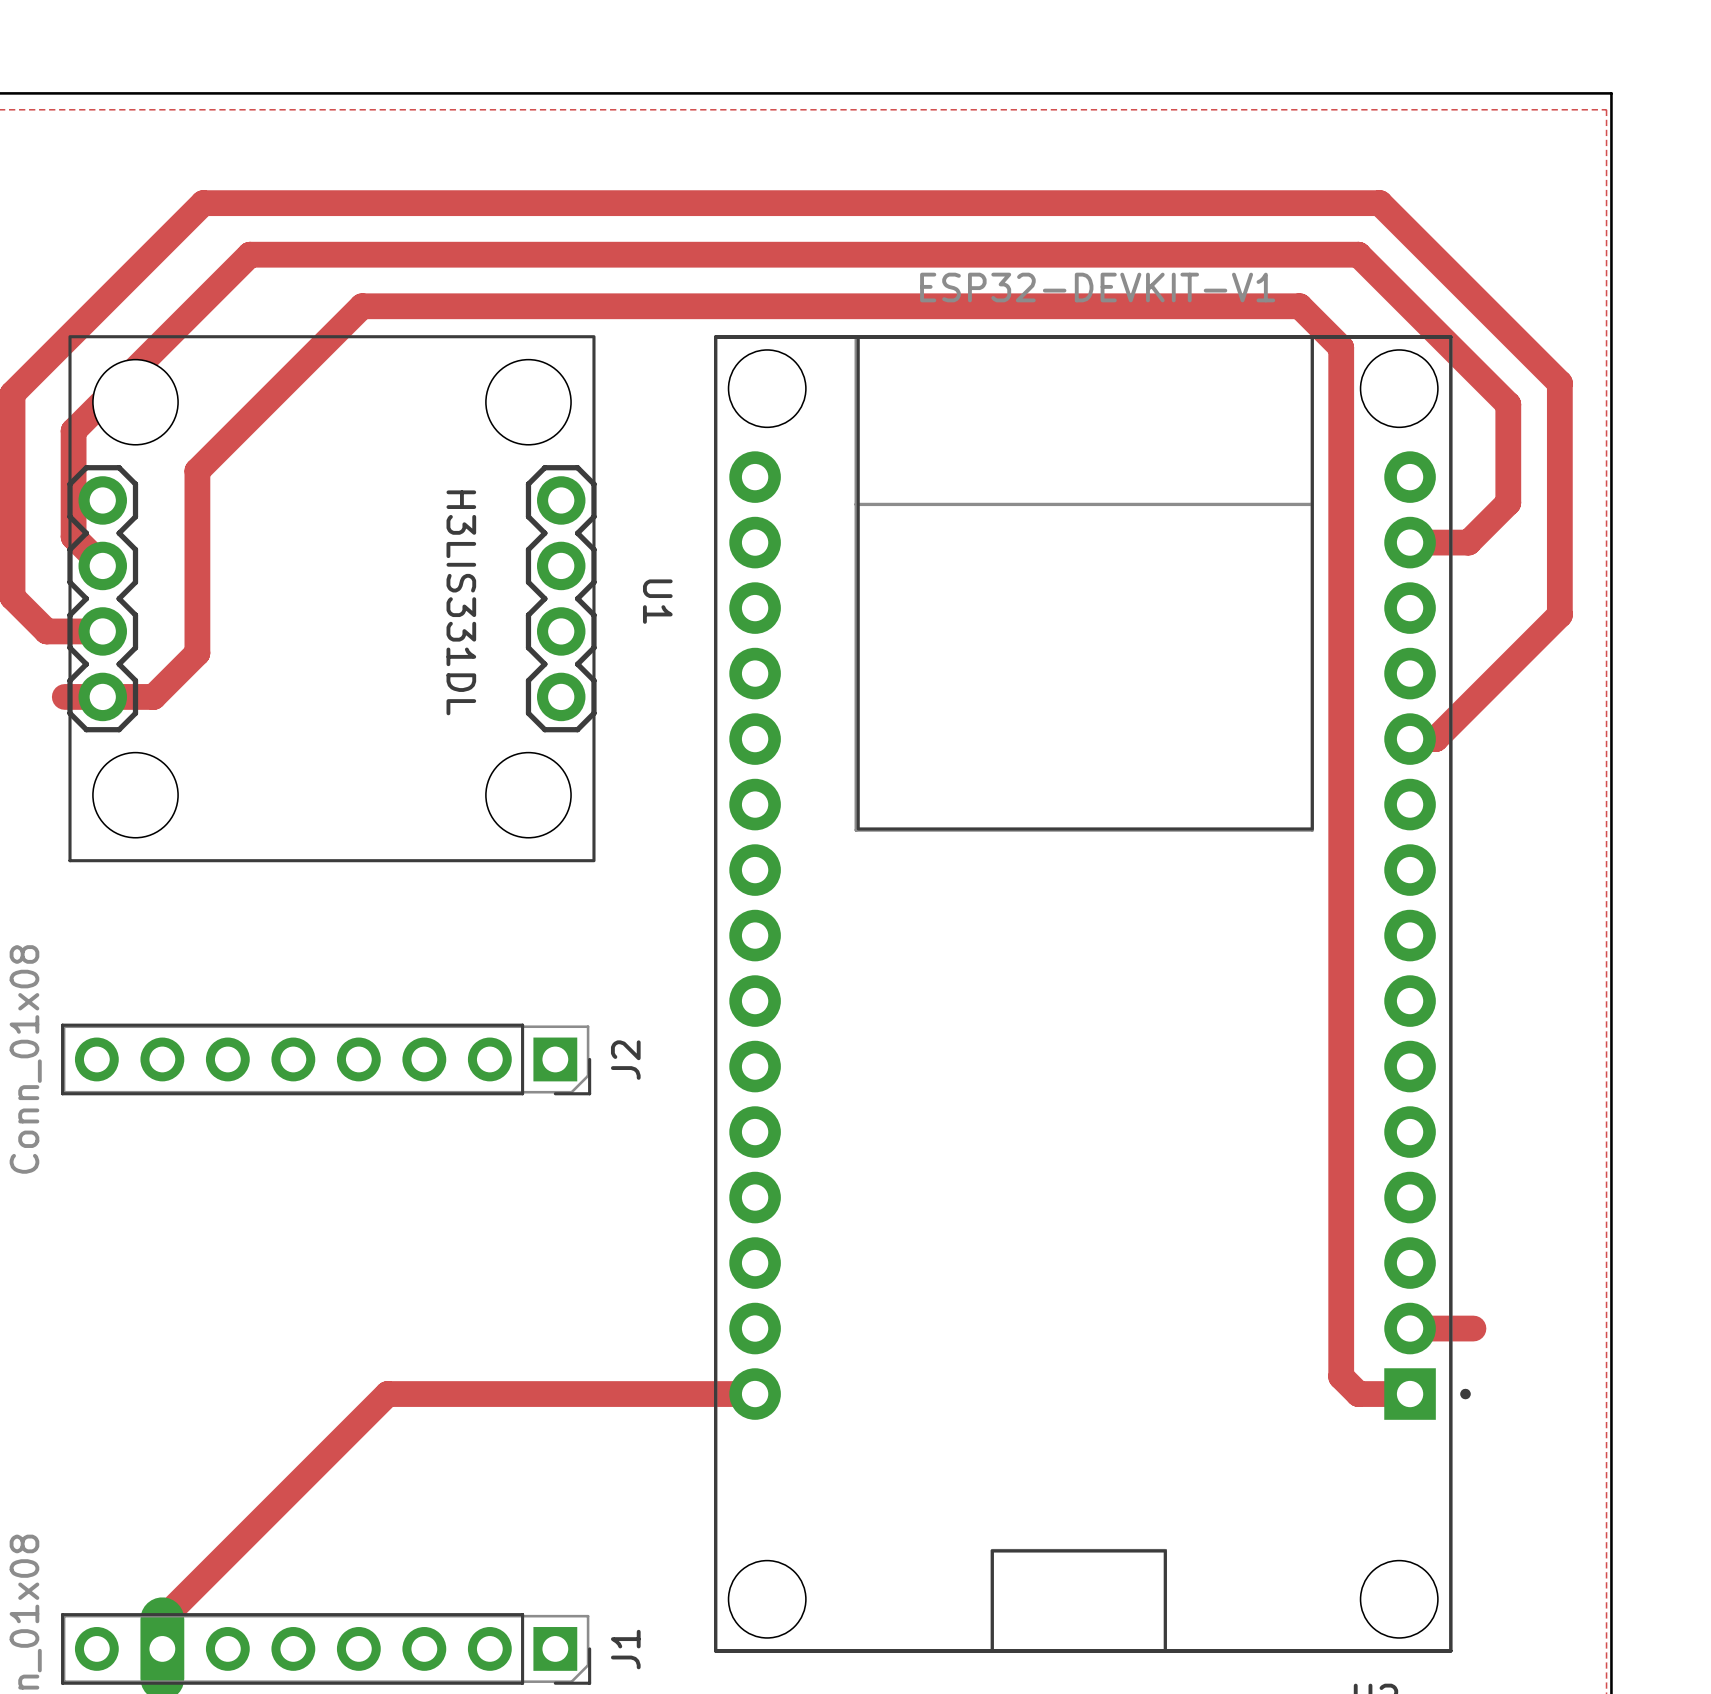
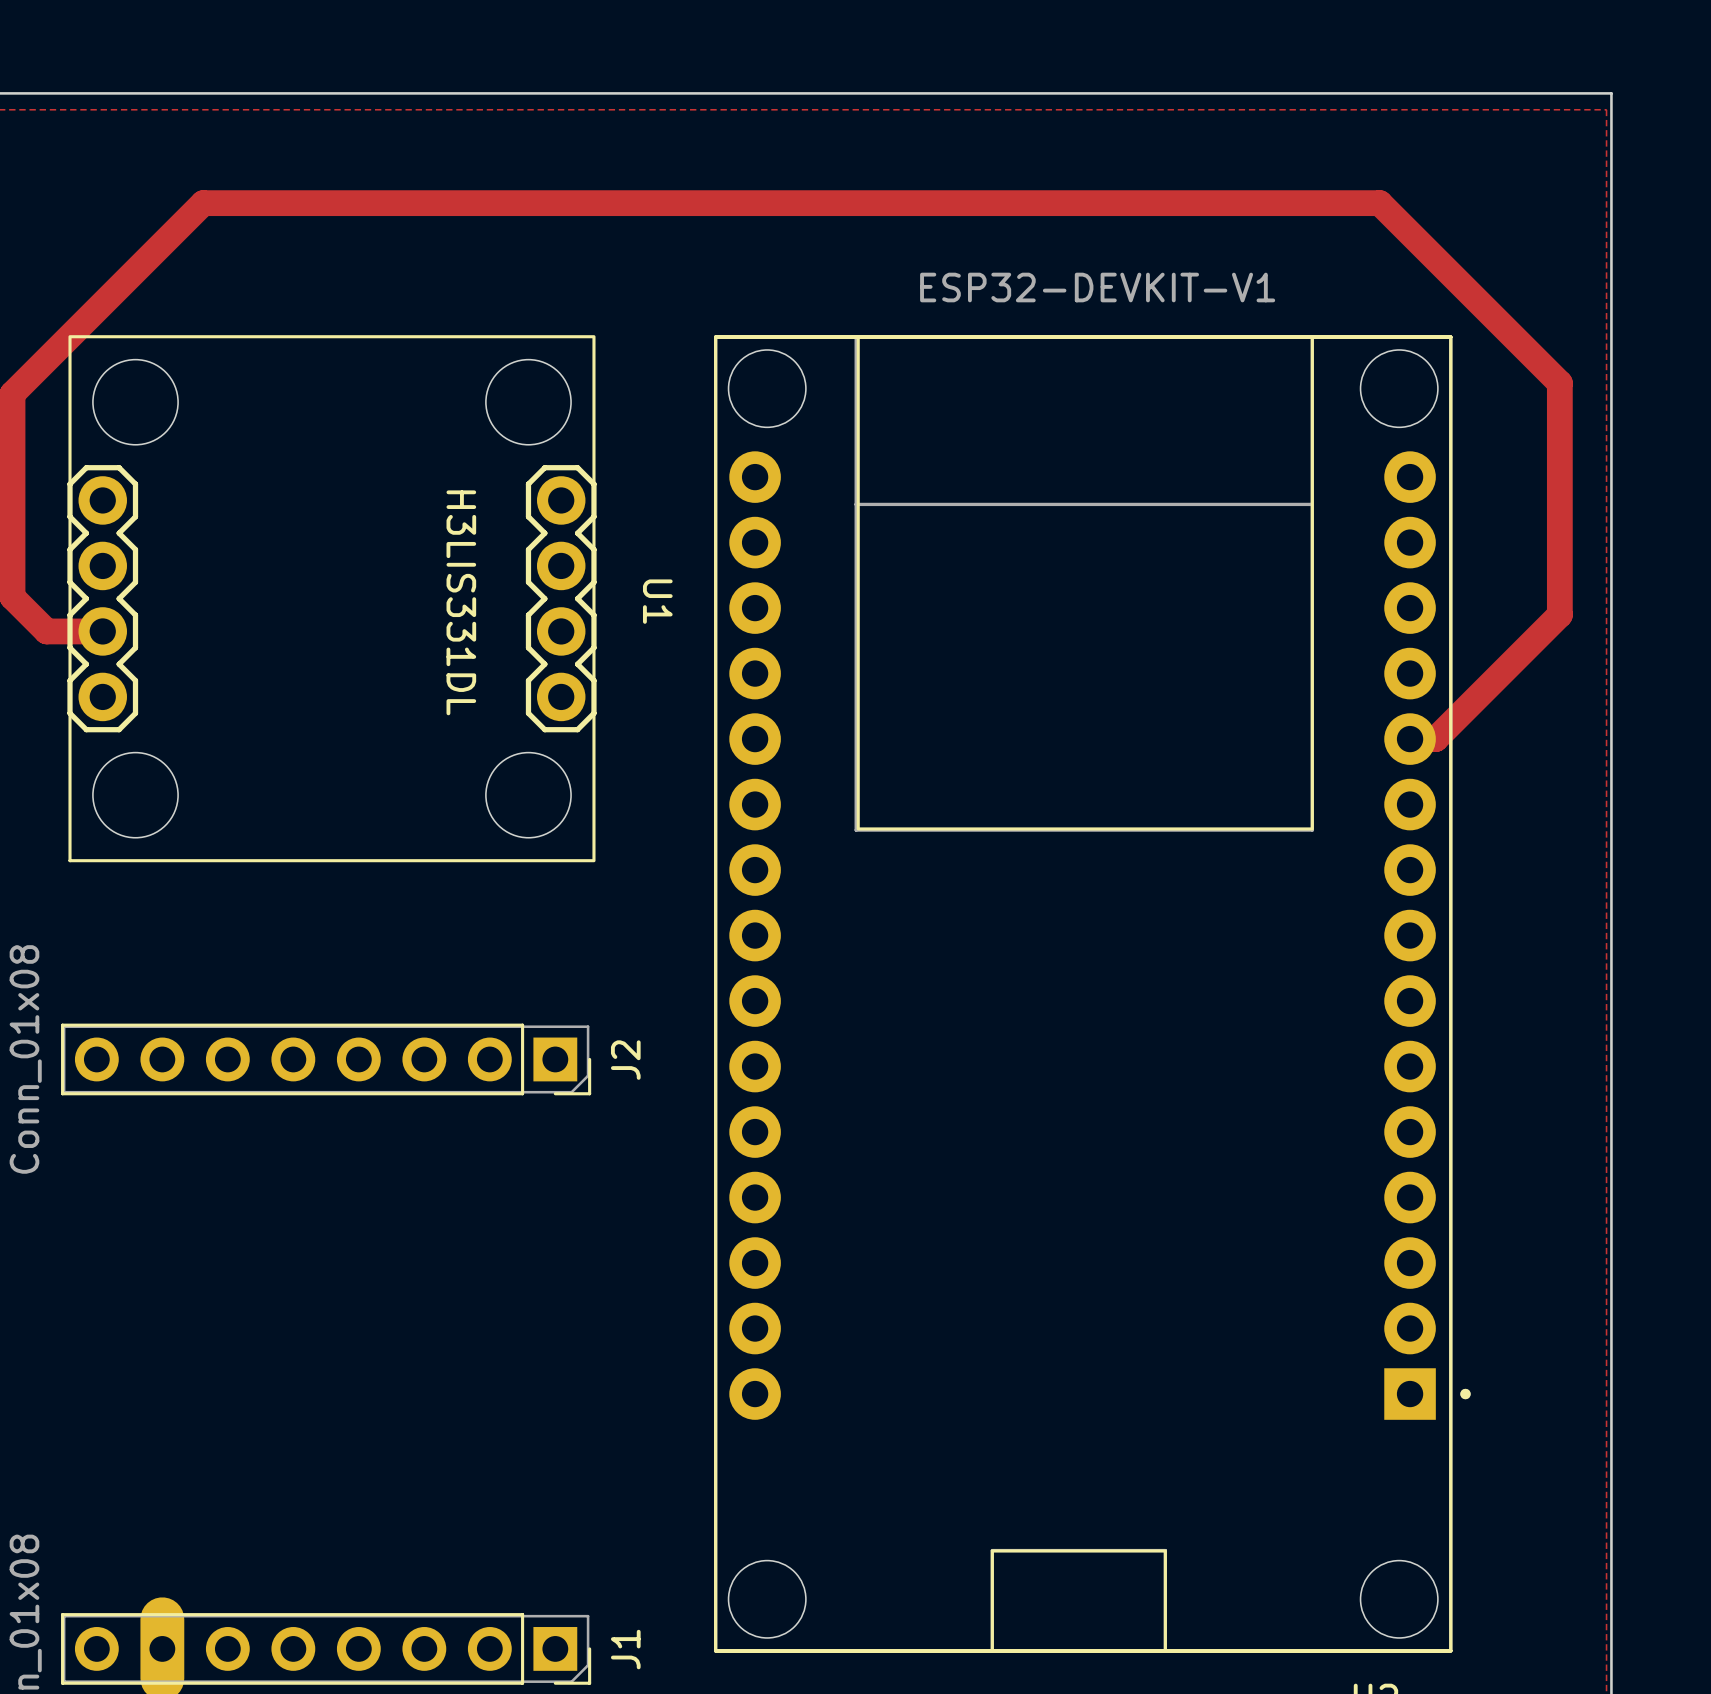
top track: (1410, 542) (1468, 542) (1508, 502) (1508, 404) (1358, 254) (249, 254) (73, 431) (73, 536) (102, 565) -> none
top track: (64, 696) (153, 696) (197, 653) (197, 470) (362, 306) (1299, 306) (1341, 347) (1341, 1376) (1358, 1394) (1410, 1394) -> none
top track: (1410, 1328) (1473, 1328) -> none
top track: (755, 1394) (387, 1394) (162, 1619) -> none

